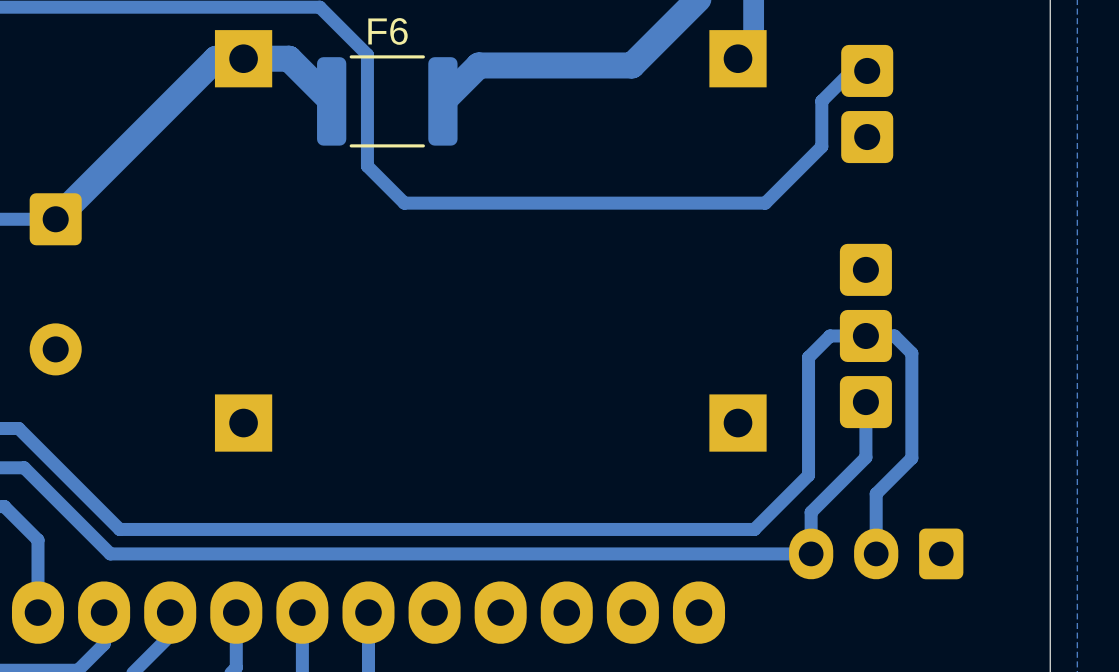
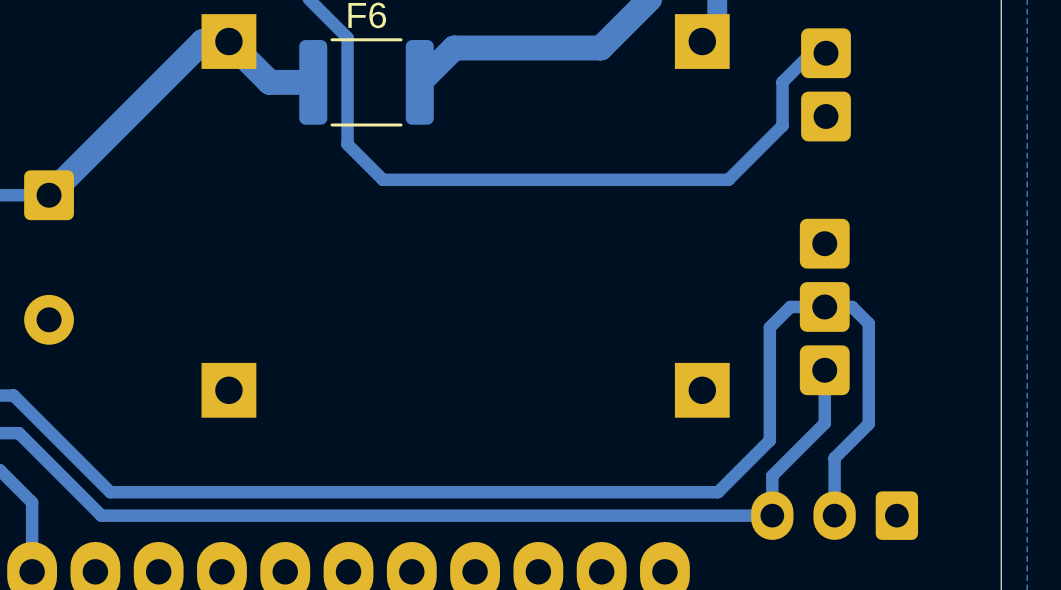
track: (243, 58) (288, 58) (331, 101) -> (228, 41) (269, 82) (313, 82)

